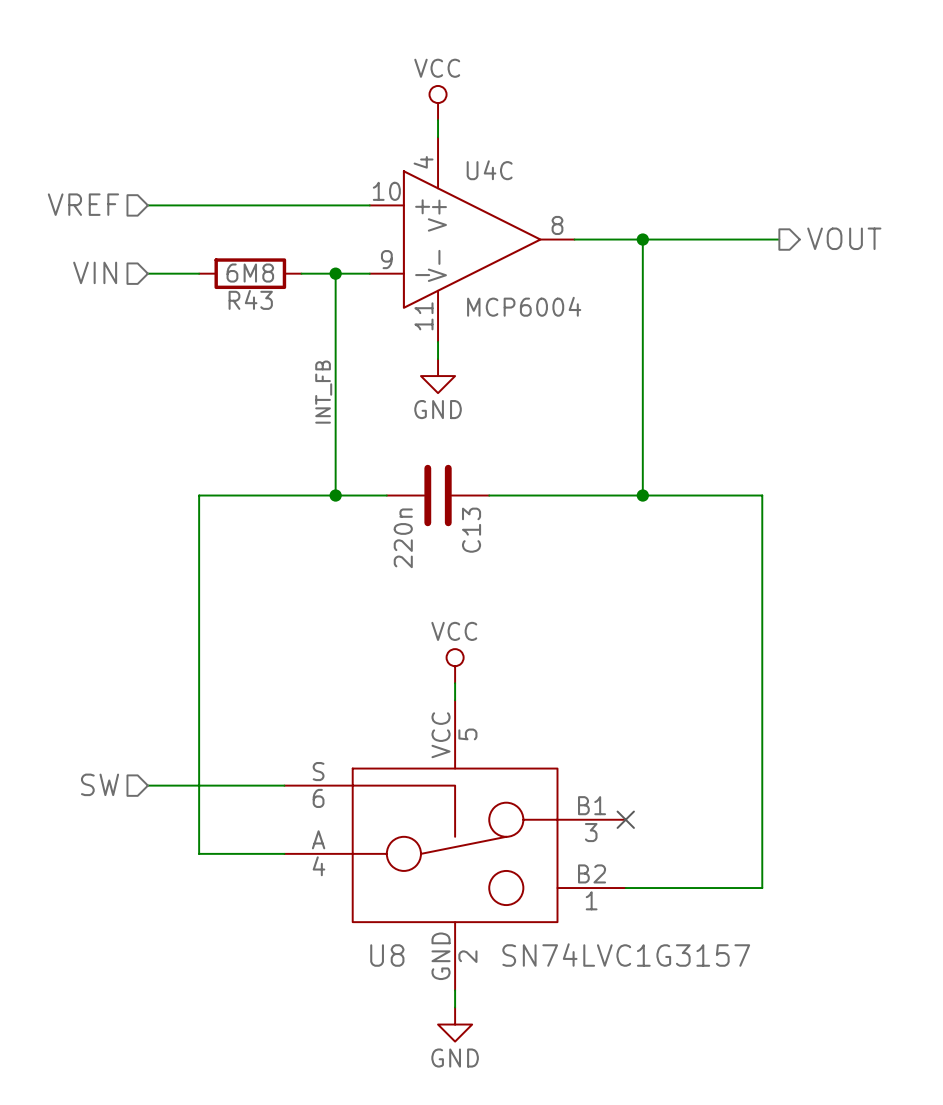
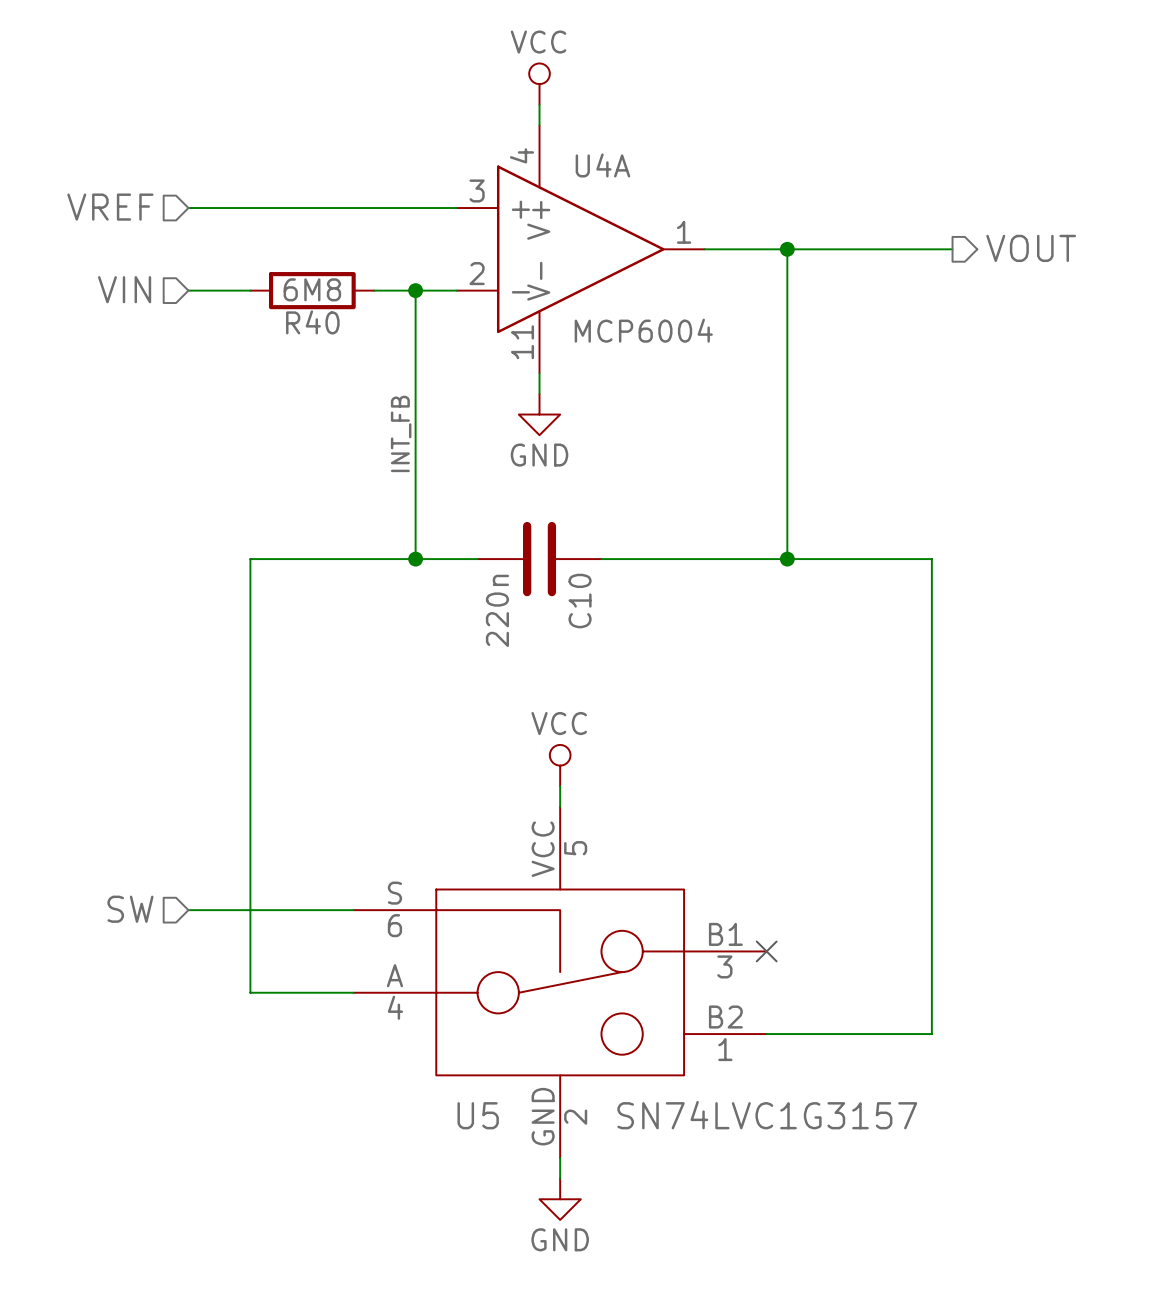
U4C name: U4C (489, 170) -> U4A (602, 165)
U4C pin number: 10 (386, 191) -> 3 (477, 190)
U4C pin number: 8 (557, 225) -> 1 (684, 232)
U4C pin number: 9 (386, 259) -> 2 (477, 273)
R43 name: R43 (250, 299) -> R40 (312, 322)
C13 name: C13 (471, 530) -> C10 (580, 601)
U8 name: U8 (387, 955) -> U5 (478, 1115)

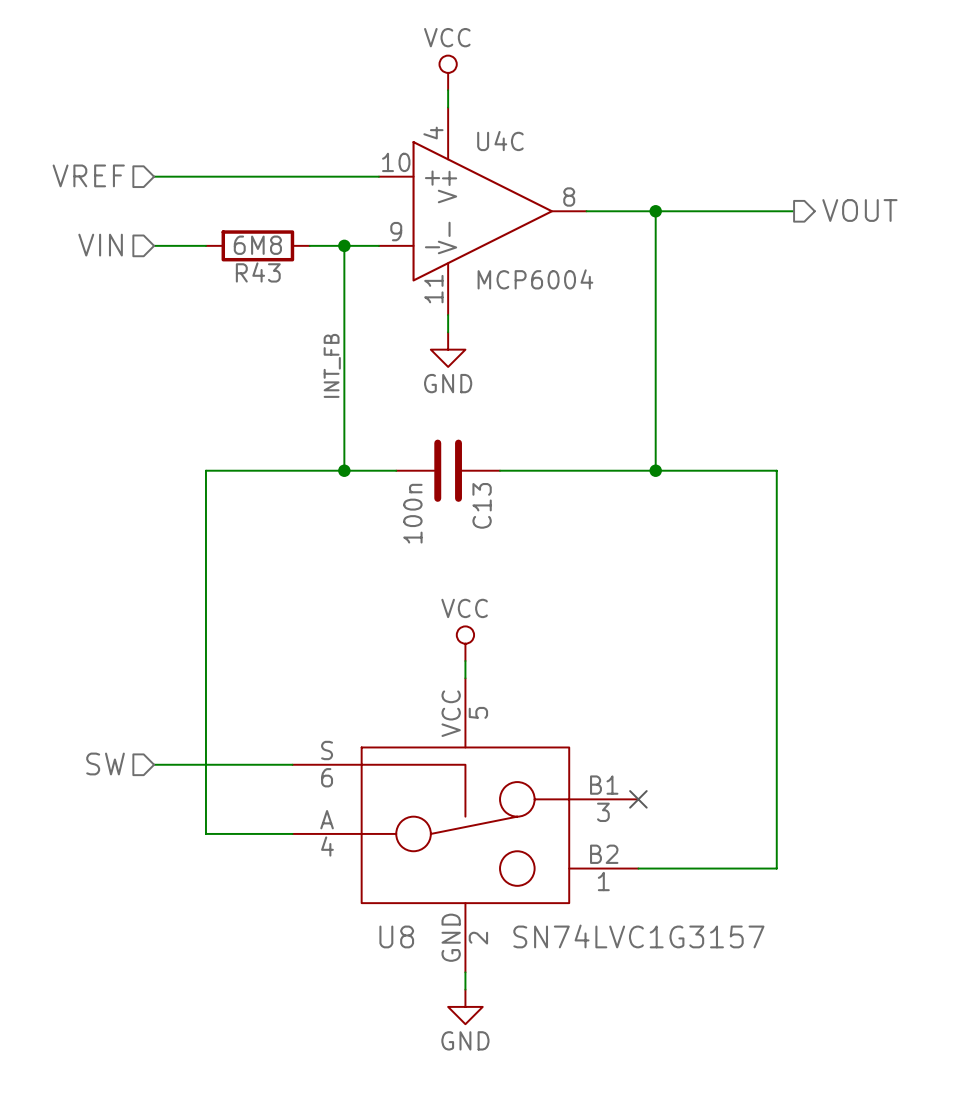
U4A name: U4A (602, 165) -> U4C (500, 141)
U4A pin number: 3 (477, 190) -> 10 (396, 162)
U4A pin number: 1 (684, 232) -> 8 (569, 197)
U4A pin number: 2 (477, 273) -> 9 (396, 231)
R40 name: R40 (312, 322) -> R43 (258, 272)
C10 name: C10 (580, 601) -> C13 (482, 505)
C10 value: 220n (497, 610) -> 100n (412, 513)
U5 name: U5 (478, 1115) -> U8 (396, 936)

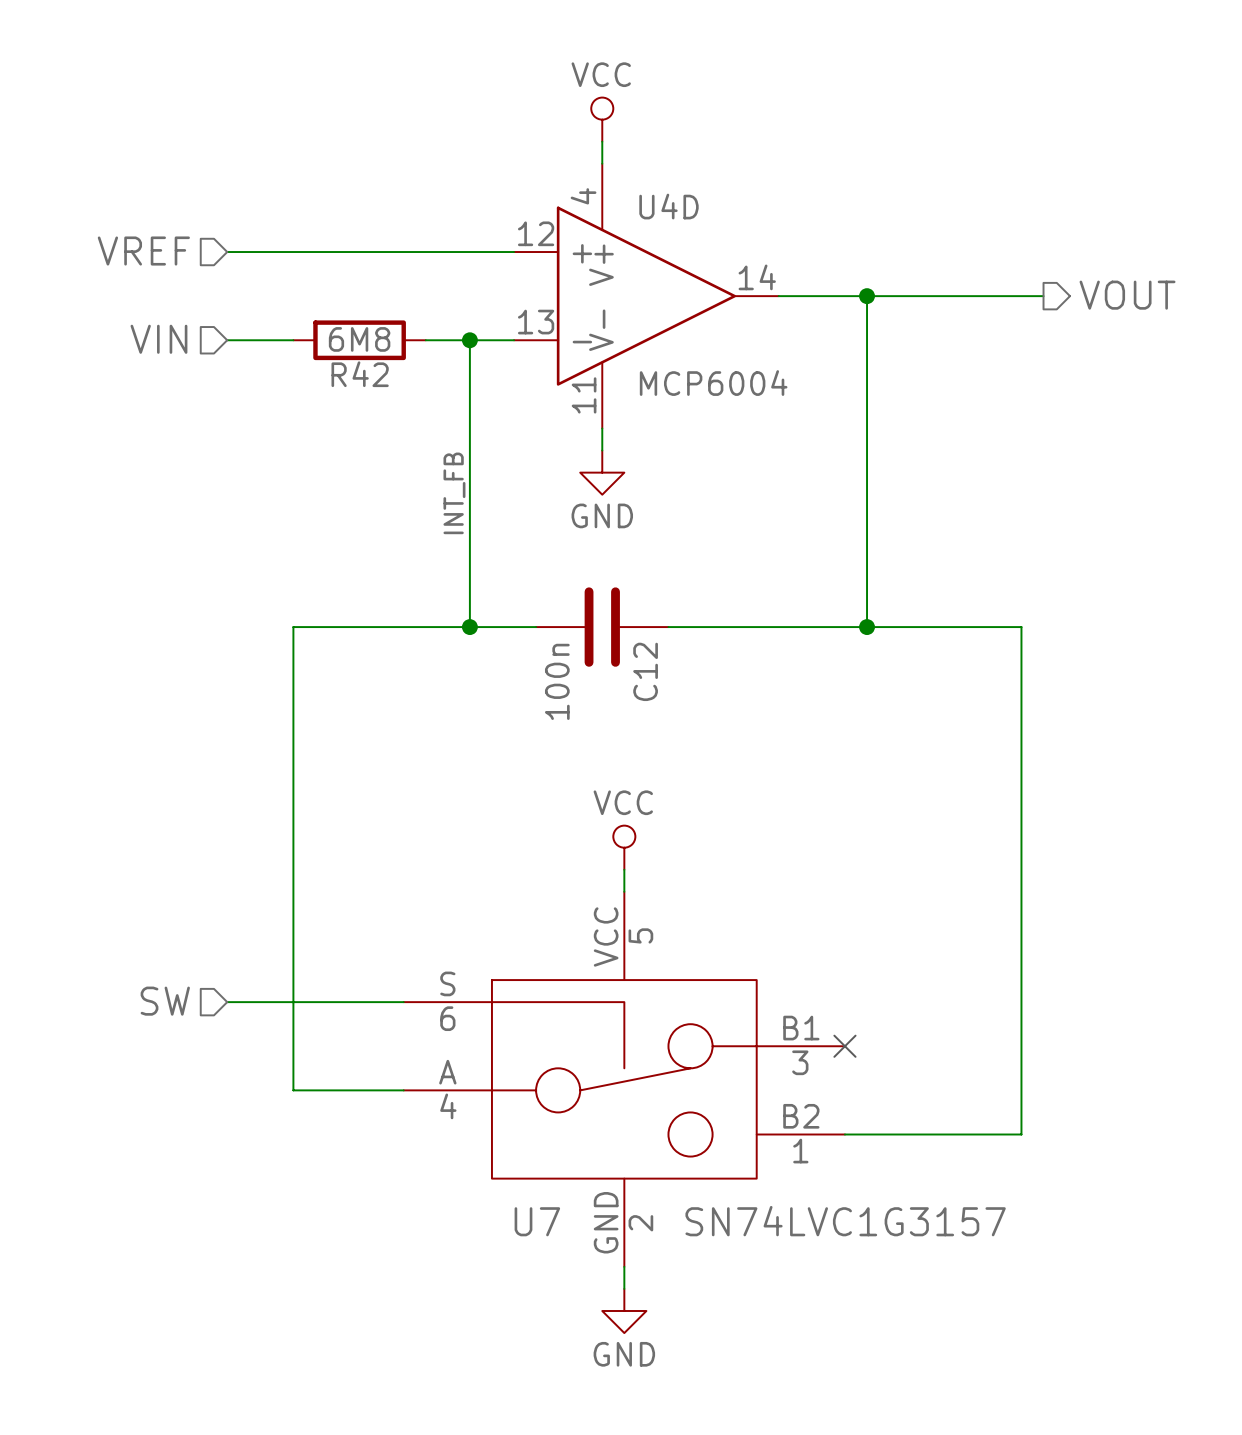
U4C name: U4C (500, 141) -> U4D (668, 206)
U4C pin number: 10 (396, 162) -> 12 (536, 233)
U4C pin number: 8 (569, 197) -> 14 (757, 277)
U4C pin number: 9 (396, 231) -> 13 (536, 322)
R43 name: R43 (258, 272) -> R42 (360, 374)
C13 name: C13 (482, 505) -> C12 (645, 671)
U8 name: U8 (396, 936) -> U7 (537, 1221)

